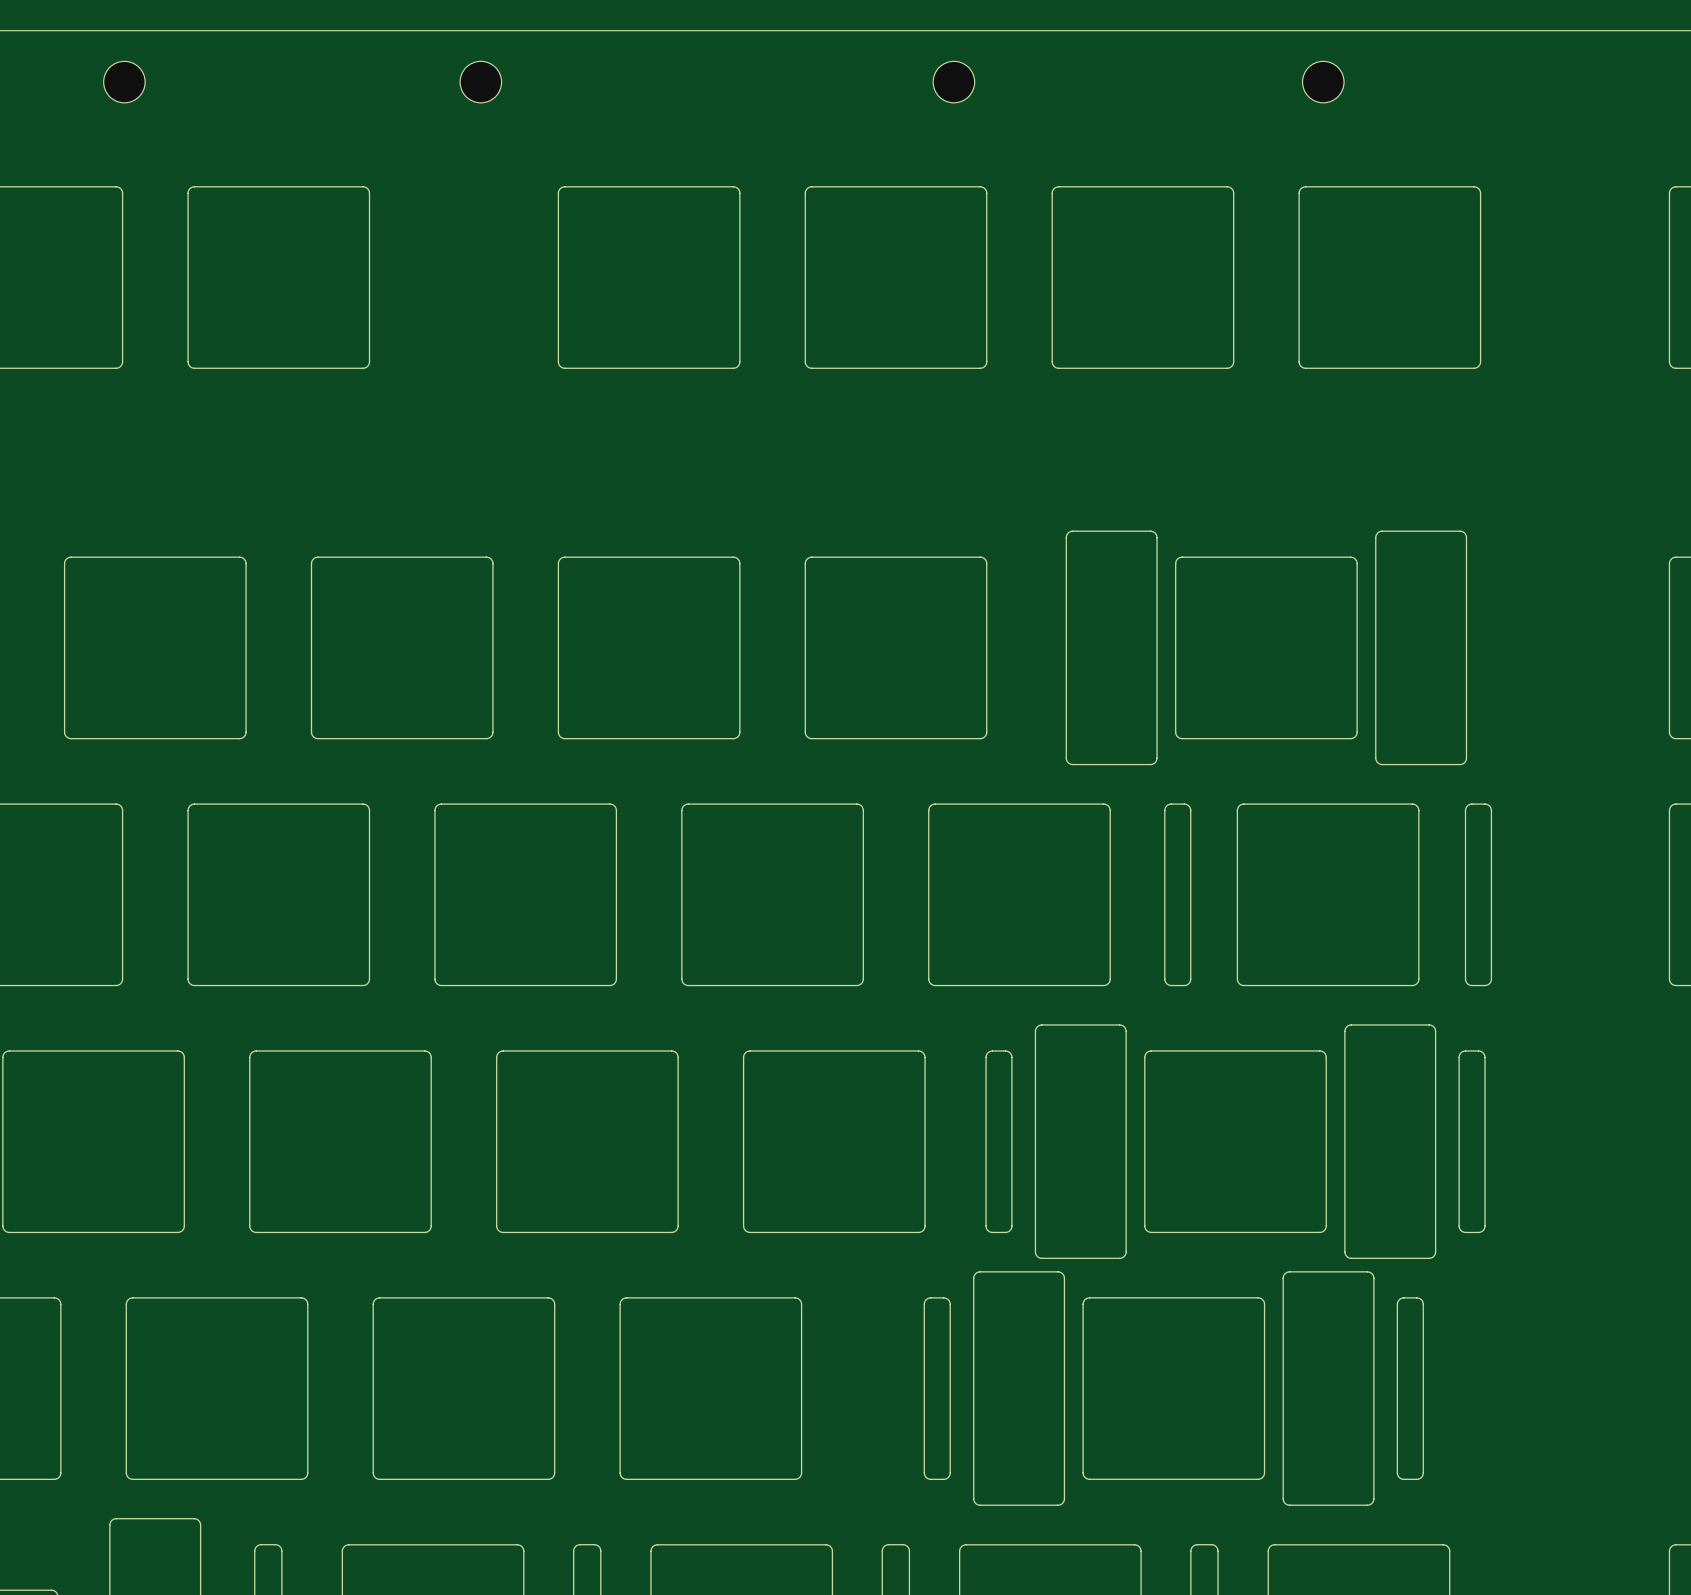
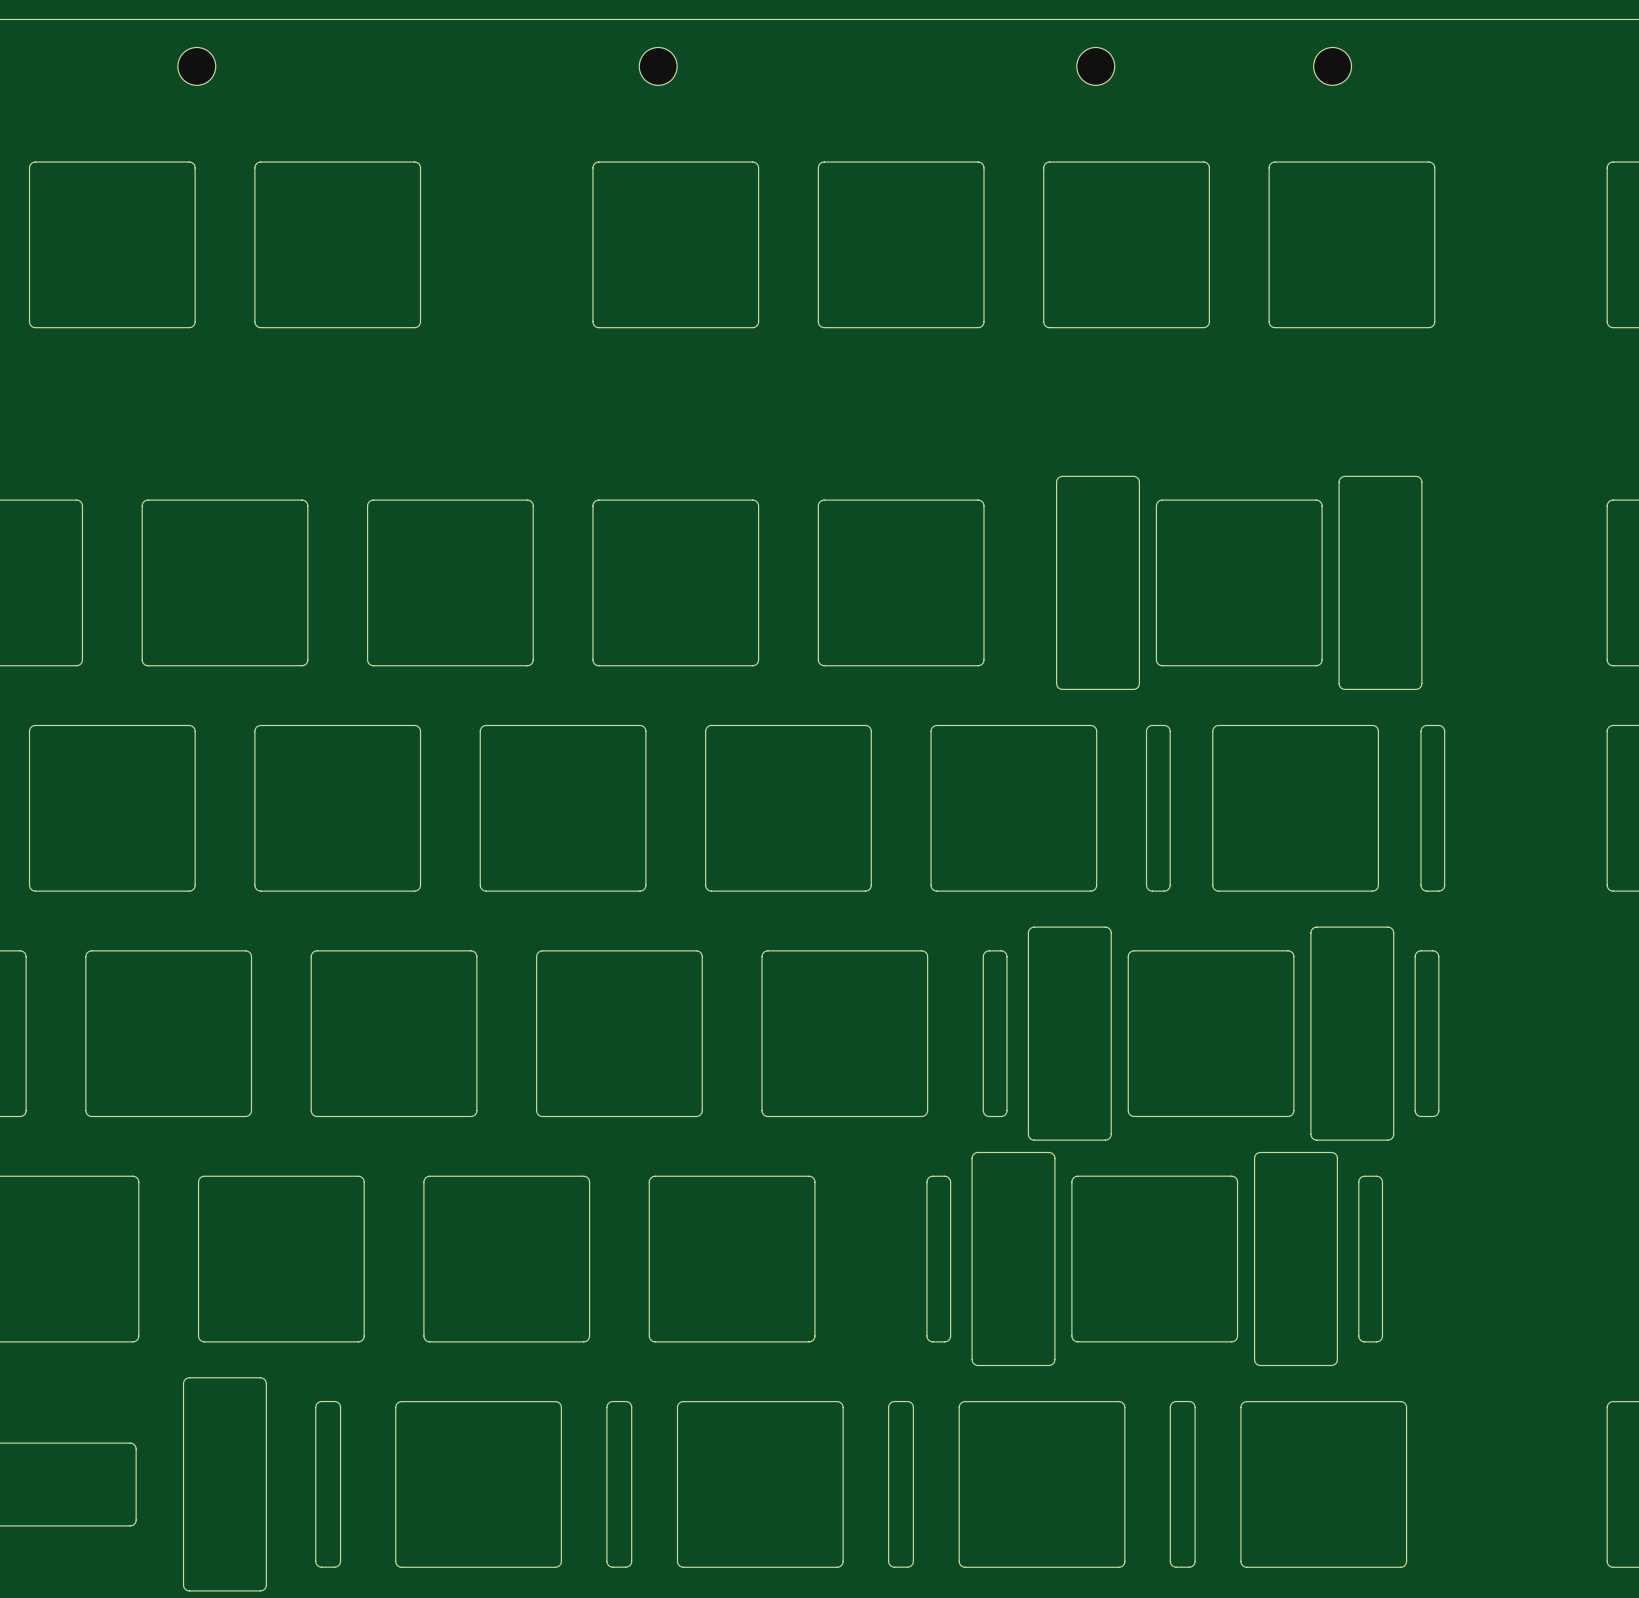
part position: (480, 82) -> (658, 66)
part: (953, 82) -> none
part: none -> (1095, 66)
part position: (1323, 82) -> (1332, 66)

